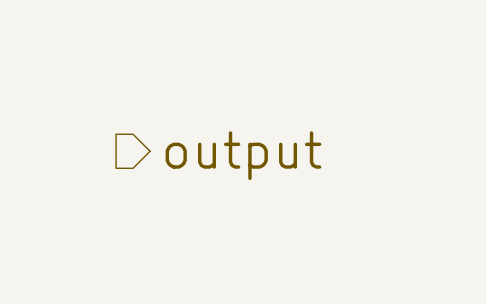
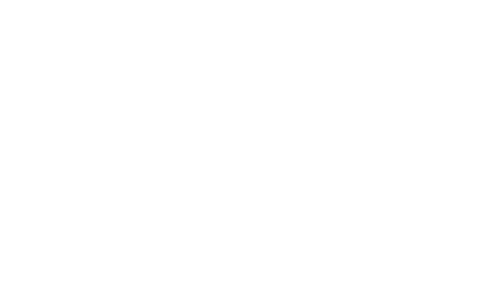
hierarchical label: output (243, 155) -> none

